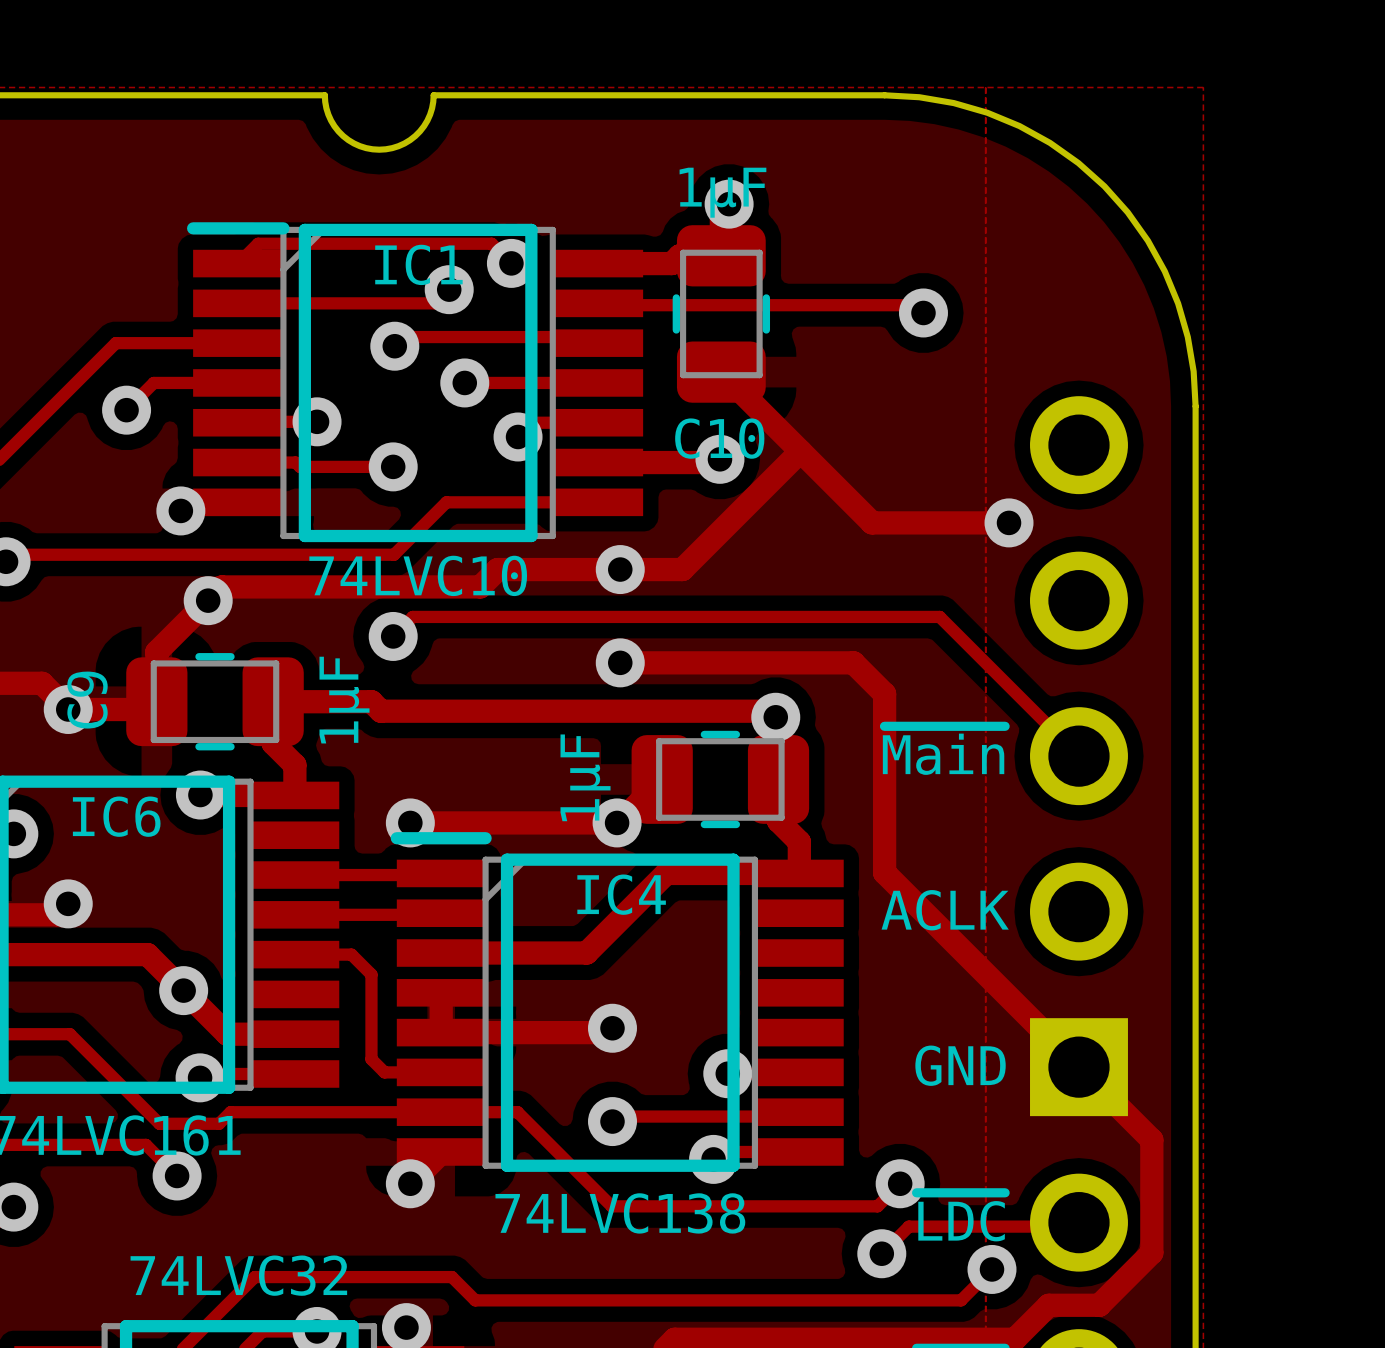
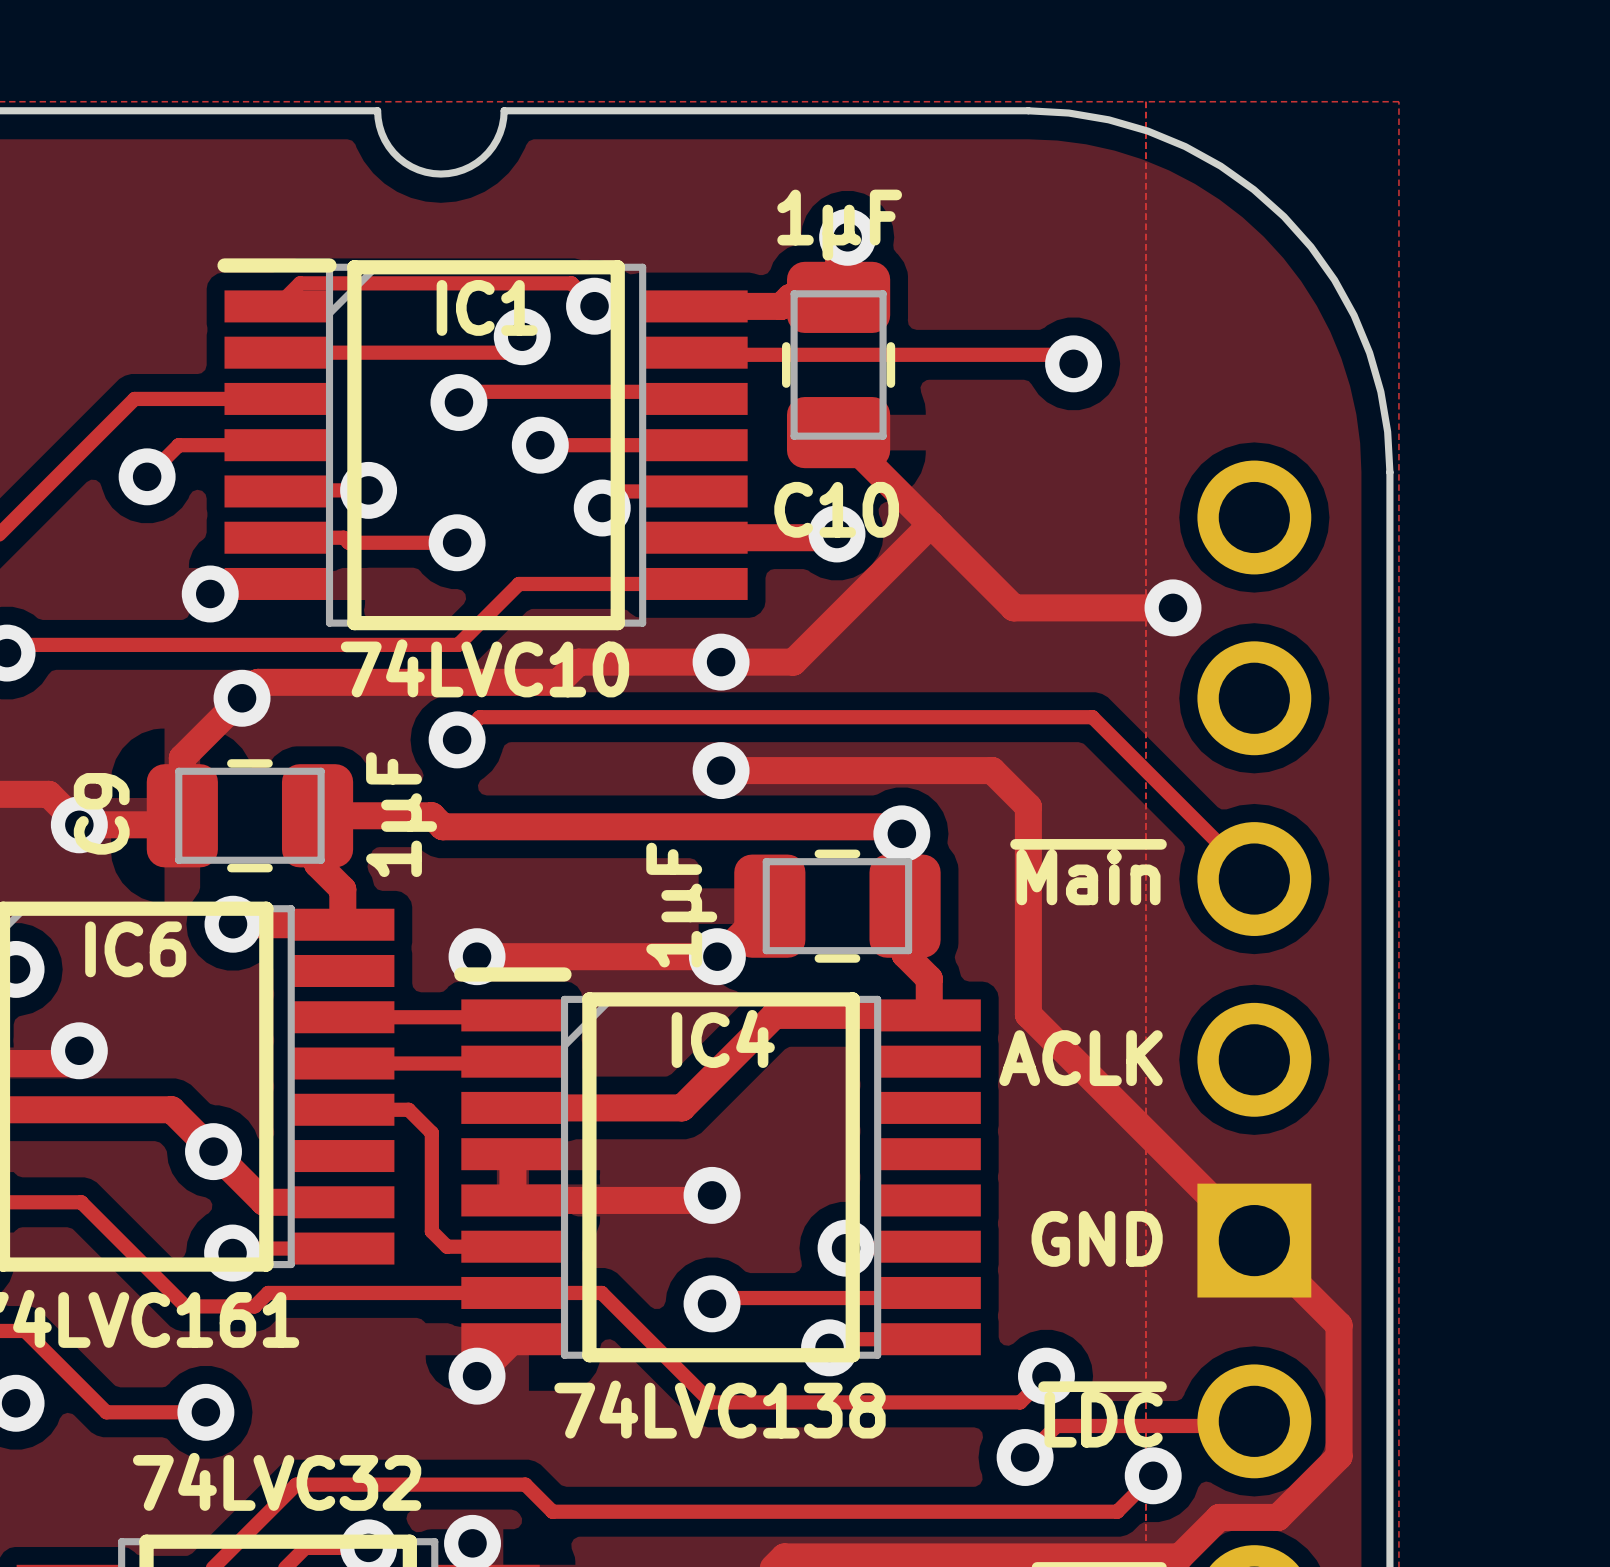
track: (21, 1144) (146, 1144) (177, 1175) -> (25, 1330) (106, 1412) (205, 1412)
via position: (177, 1175) -> (205, 1412)

